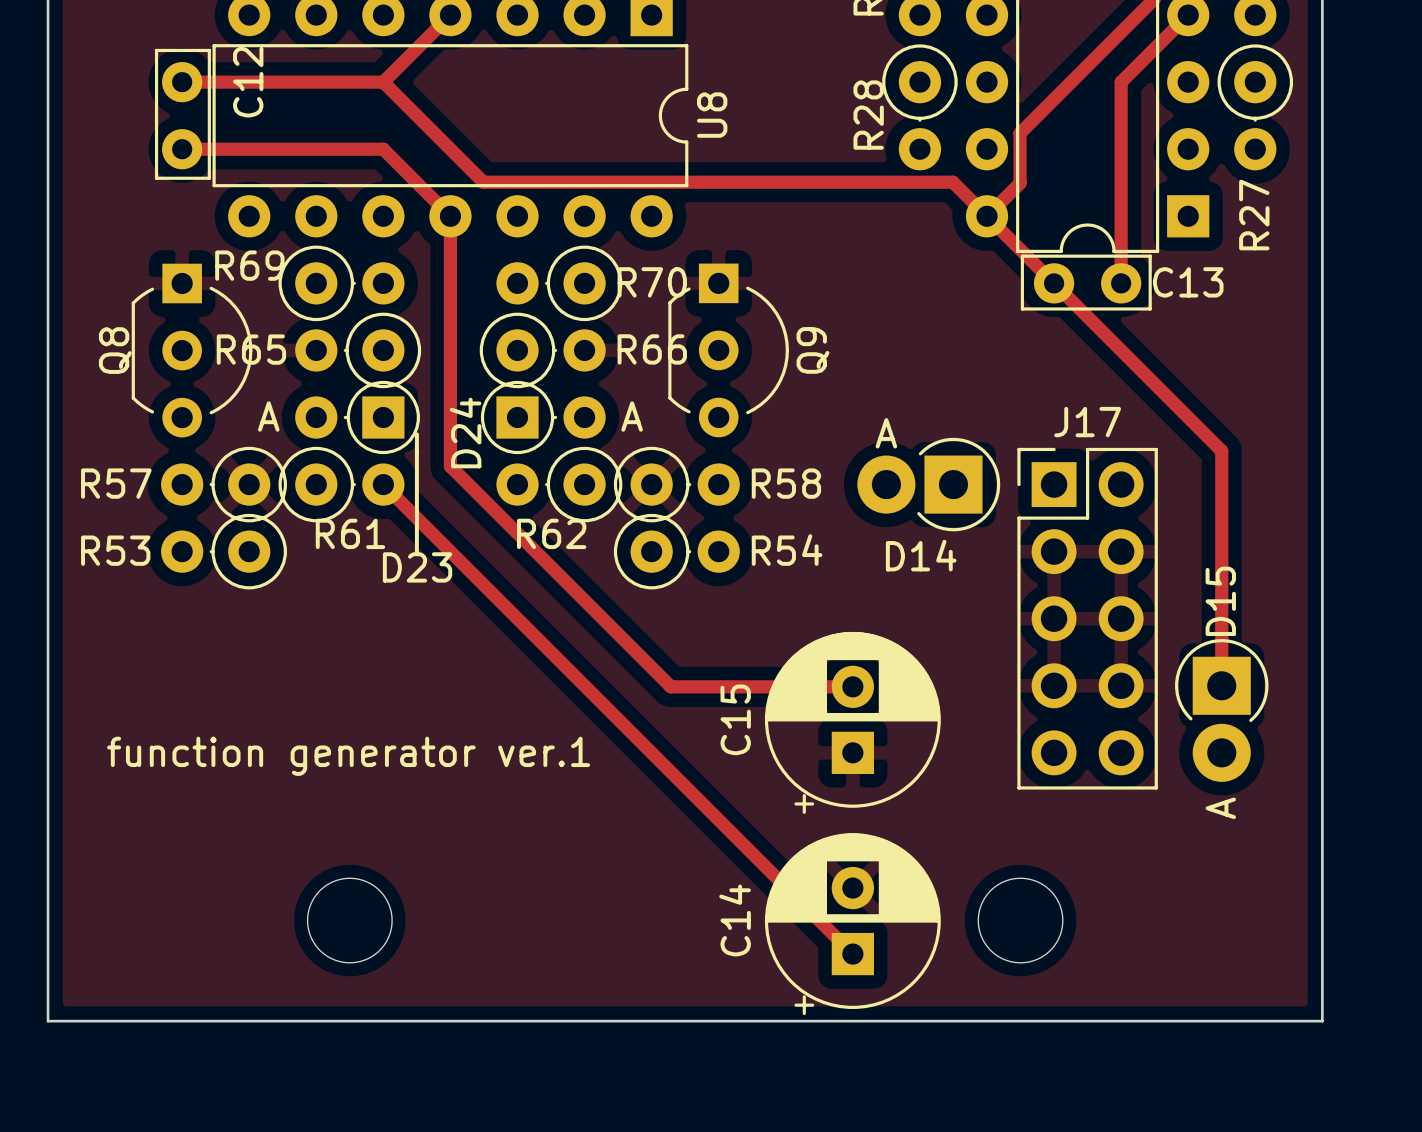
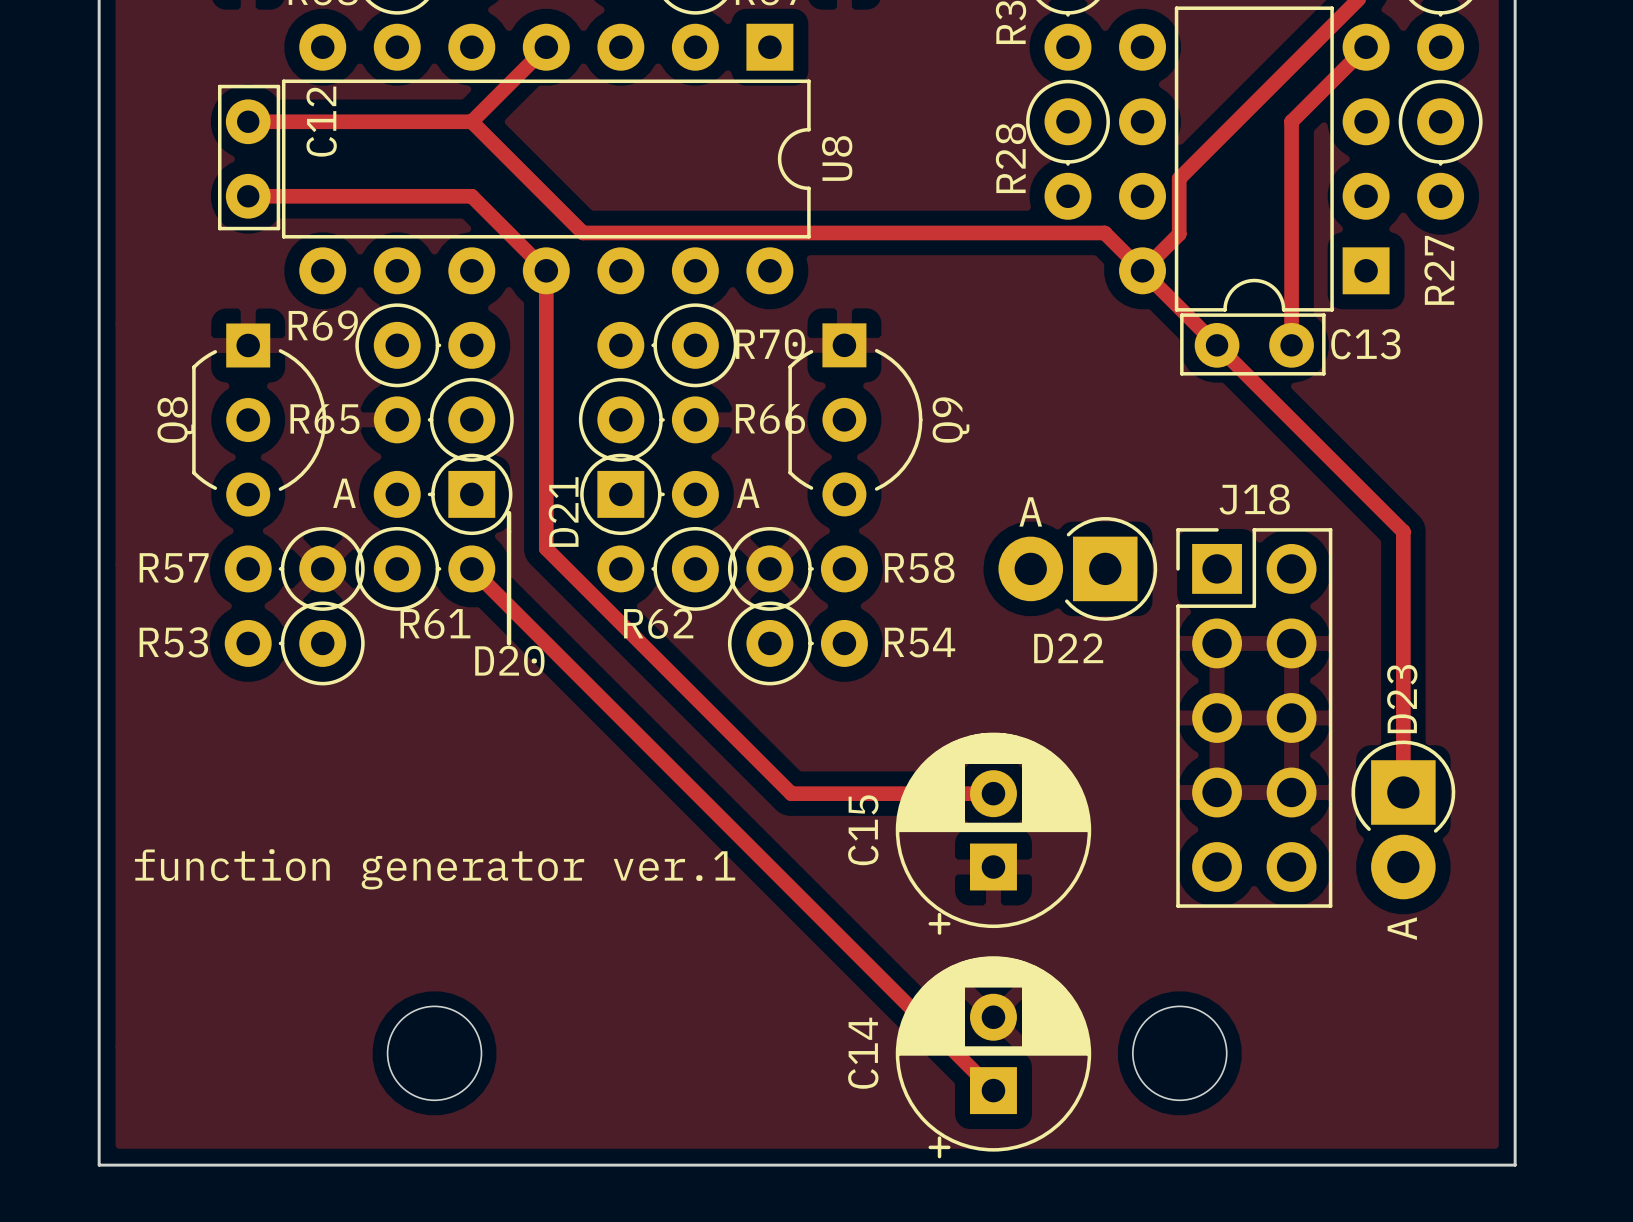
J17 name: J17 (1087, 422) -> J18 (1254, 499)
D24 name: D24 (465, 433) -> D21 (563, 512)
D14 name: D14 (921, 555) -> D22 (1068, 648)
D23 name: D23 (417, 567) -> D20 (509, 660)
D15 name: D15 (1220, 601) -> D23 (1402, 699)

